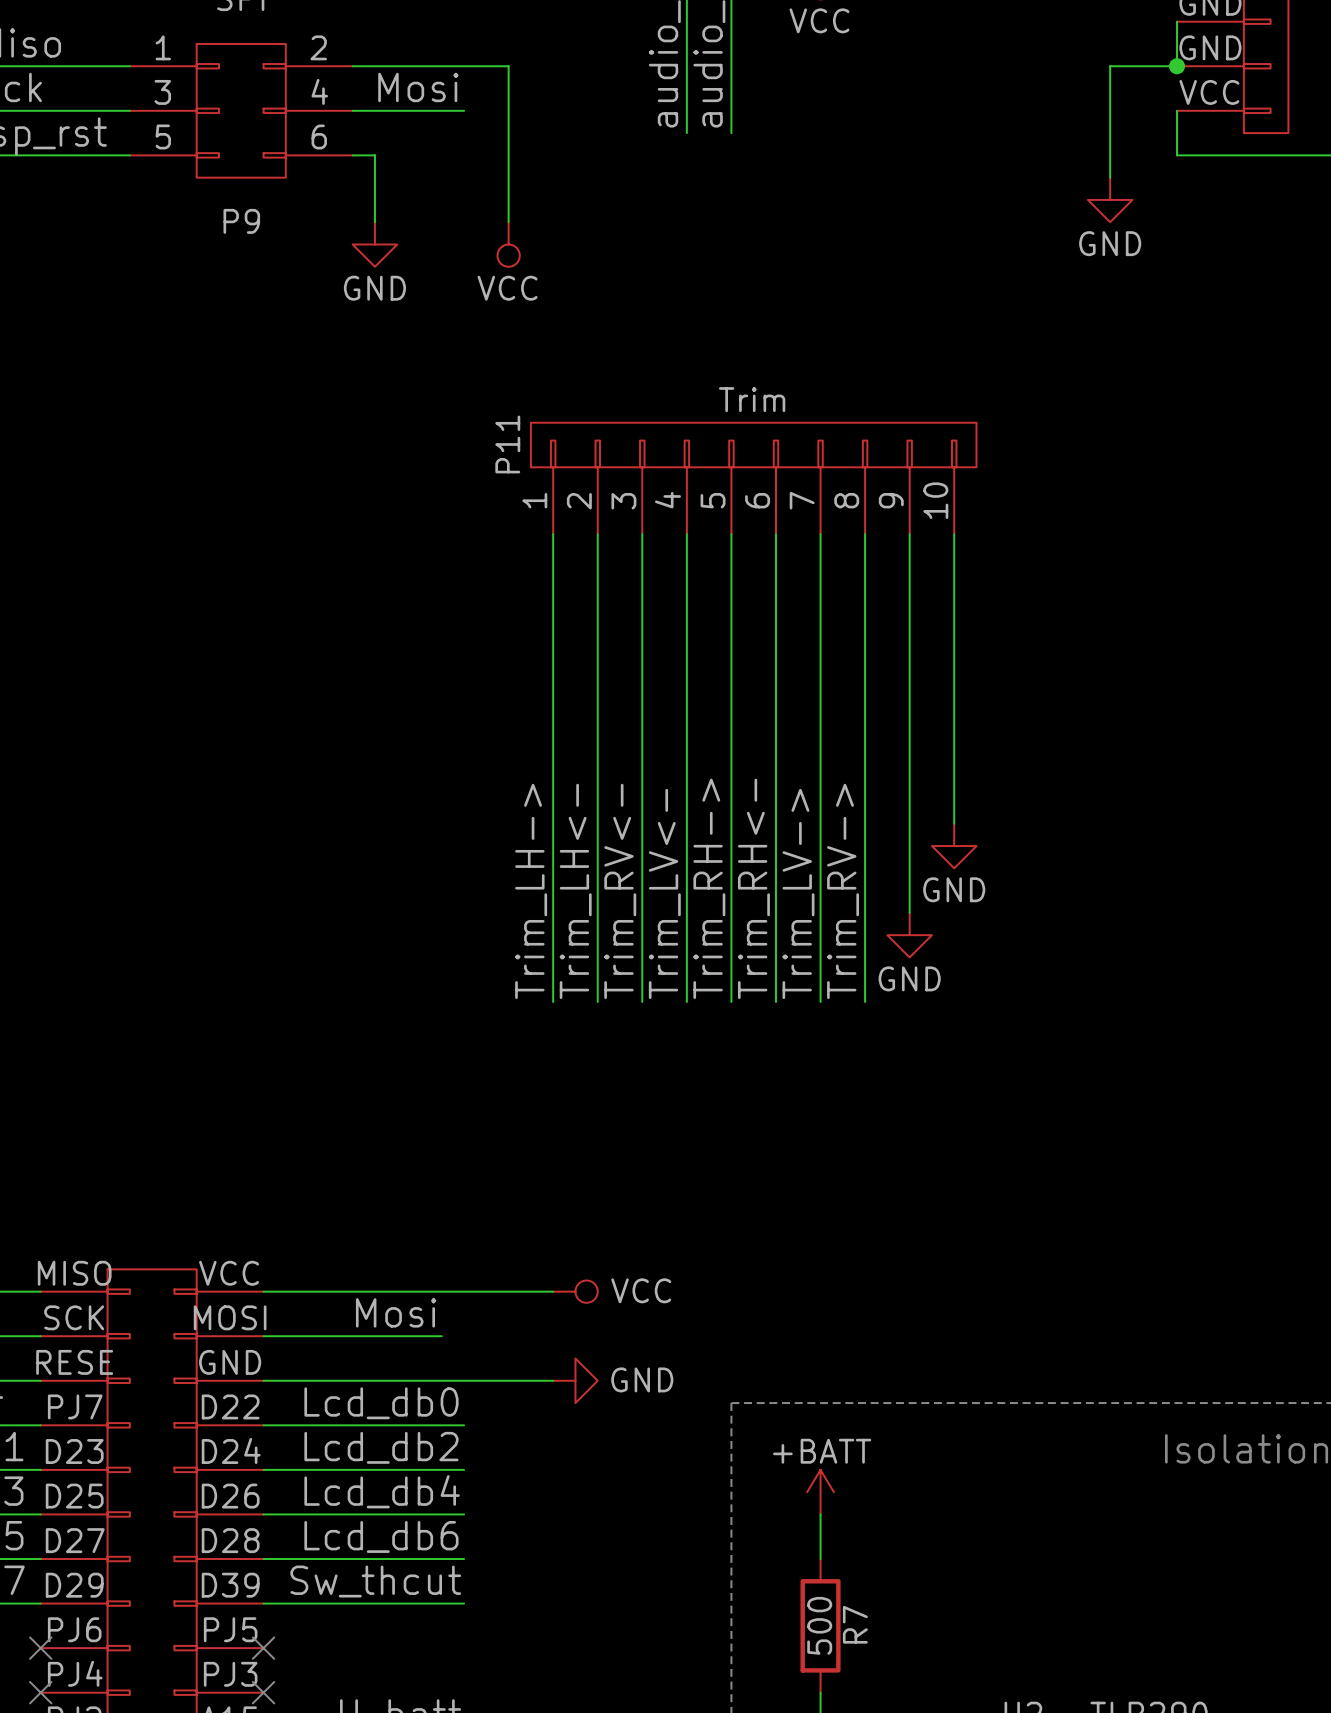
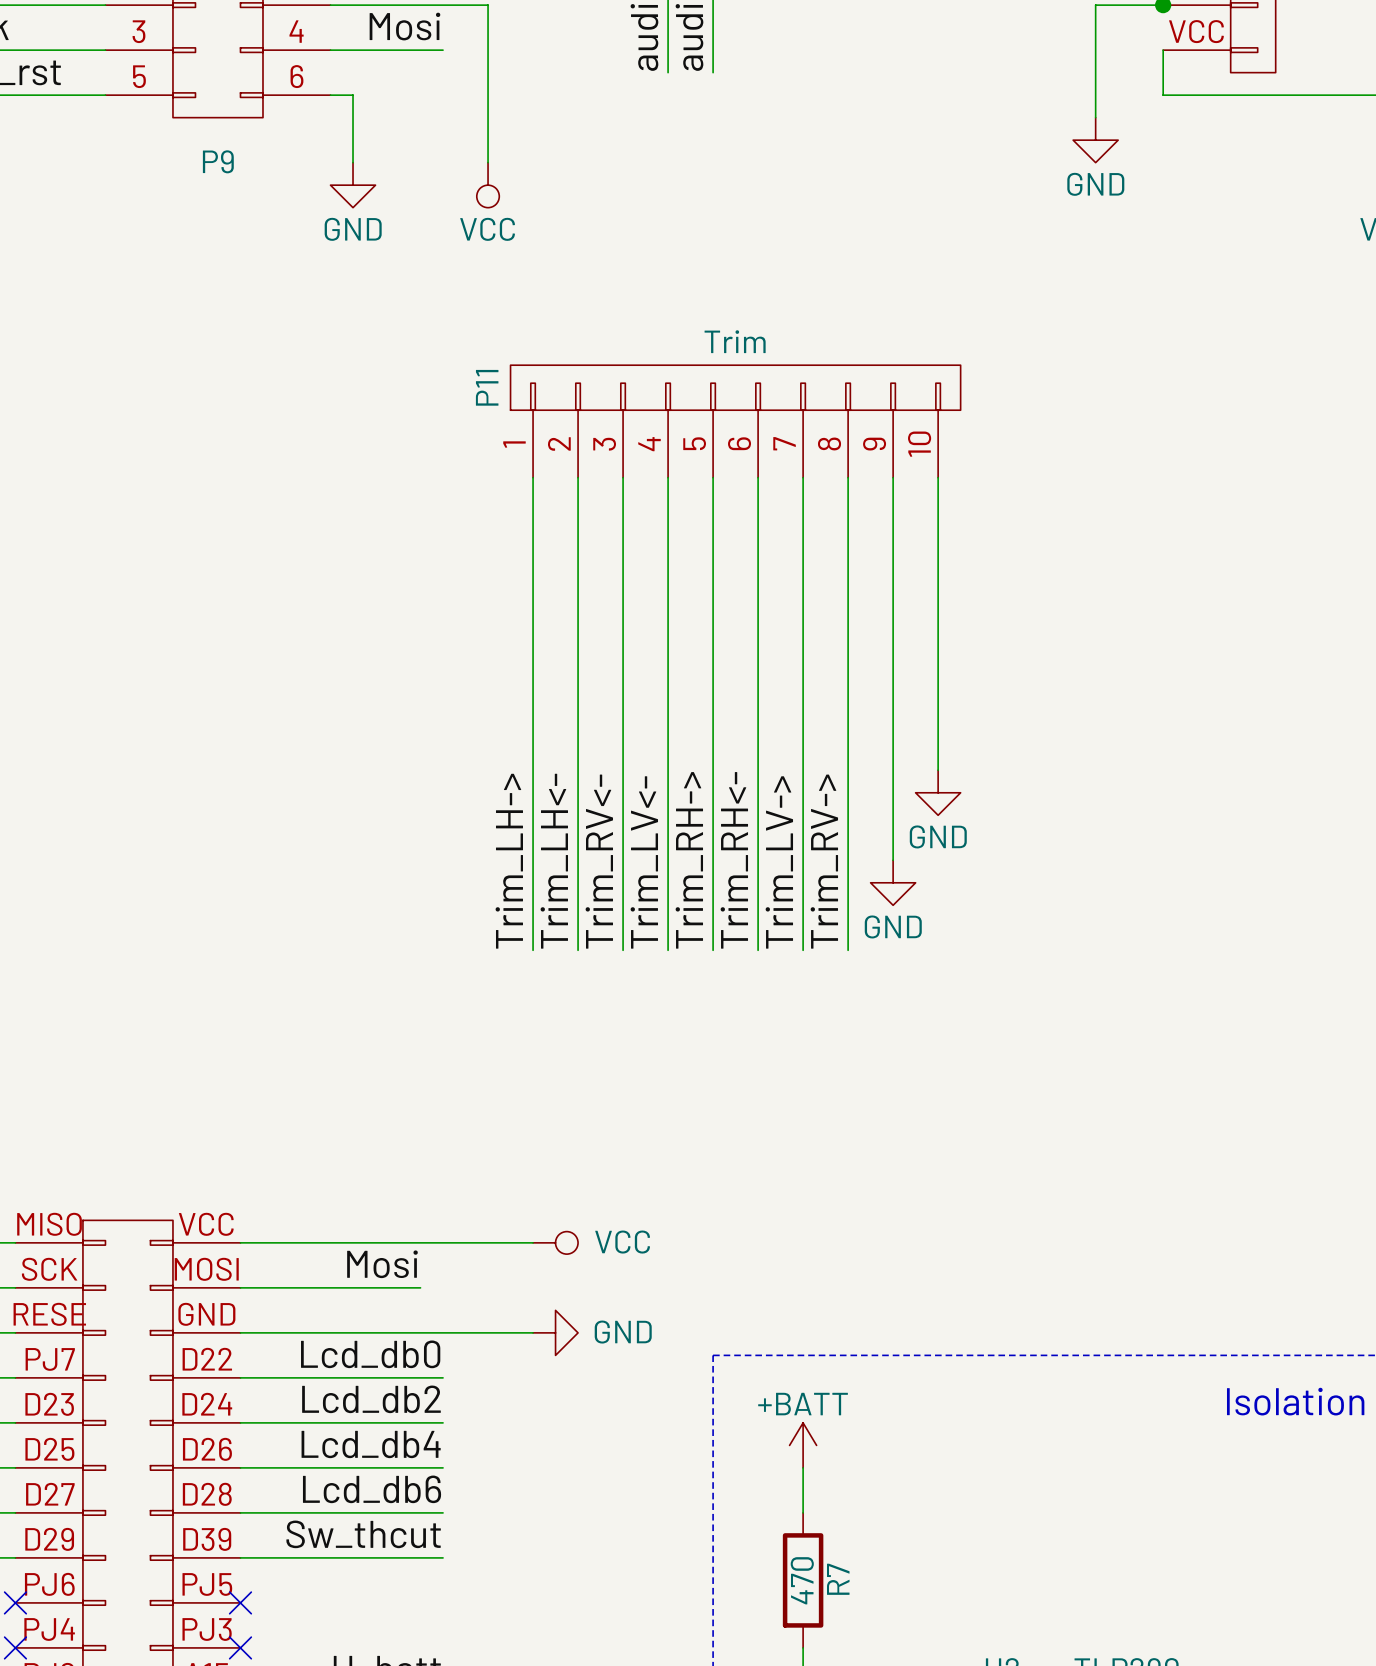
R7 value: 500 (819, 1625) -> 470 (802, 1580)

